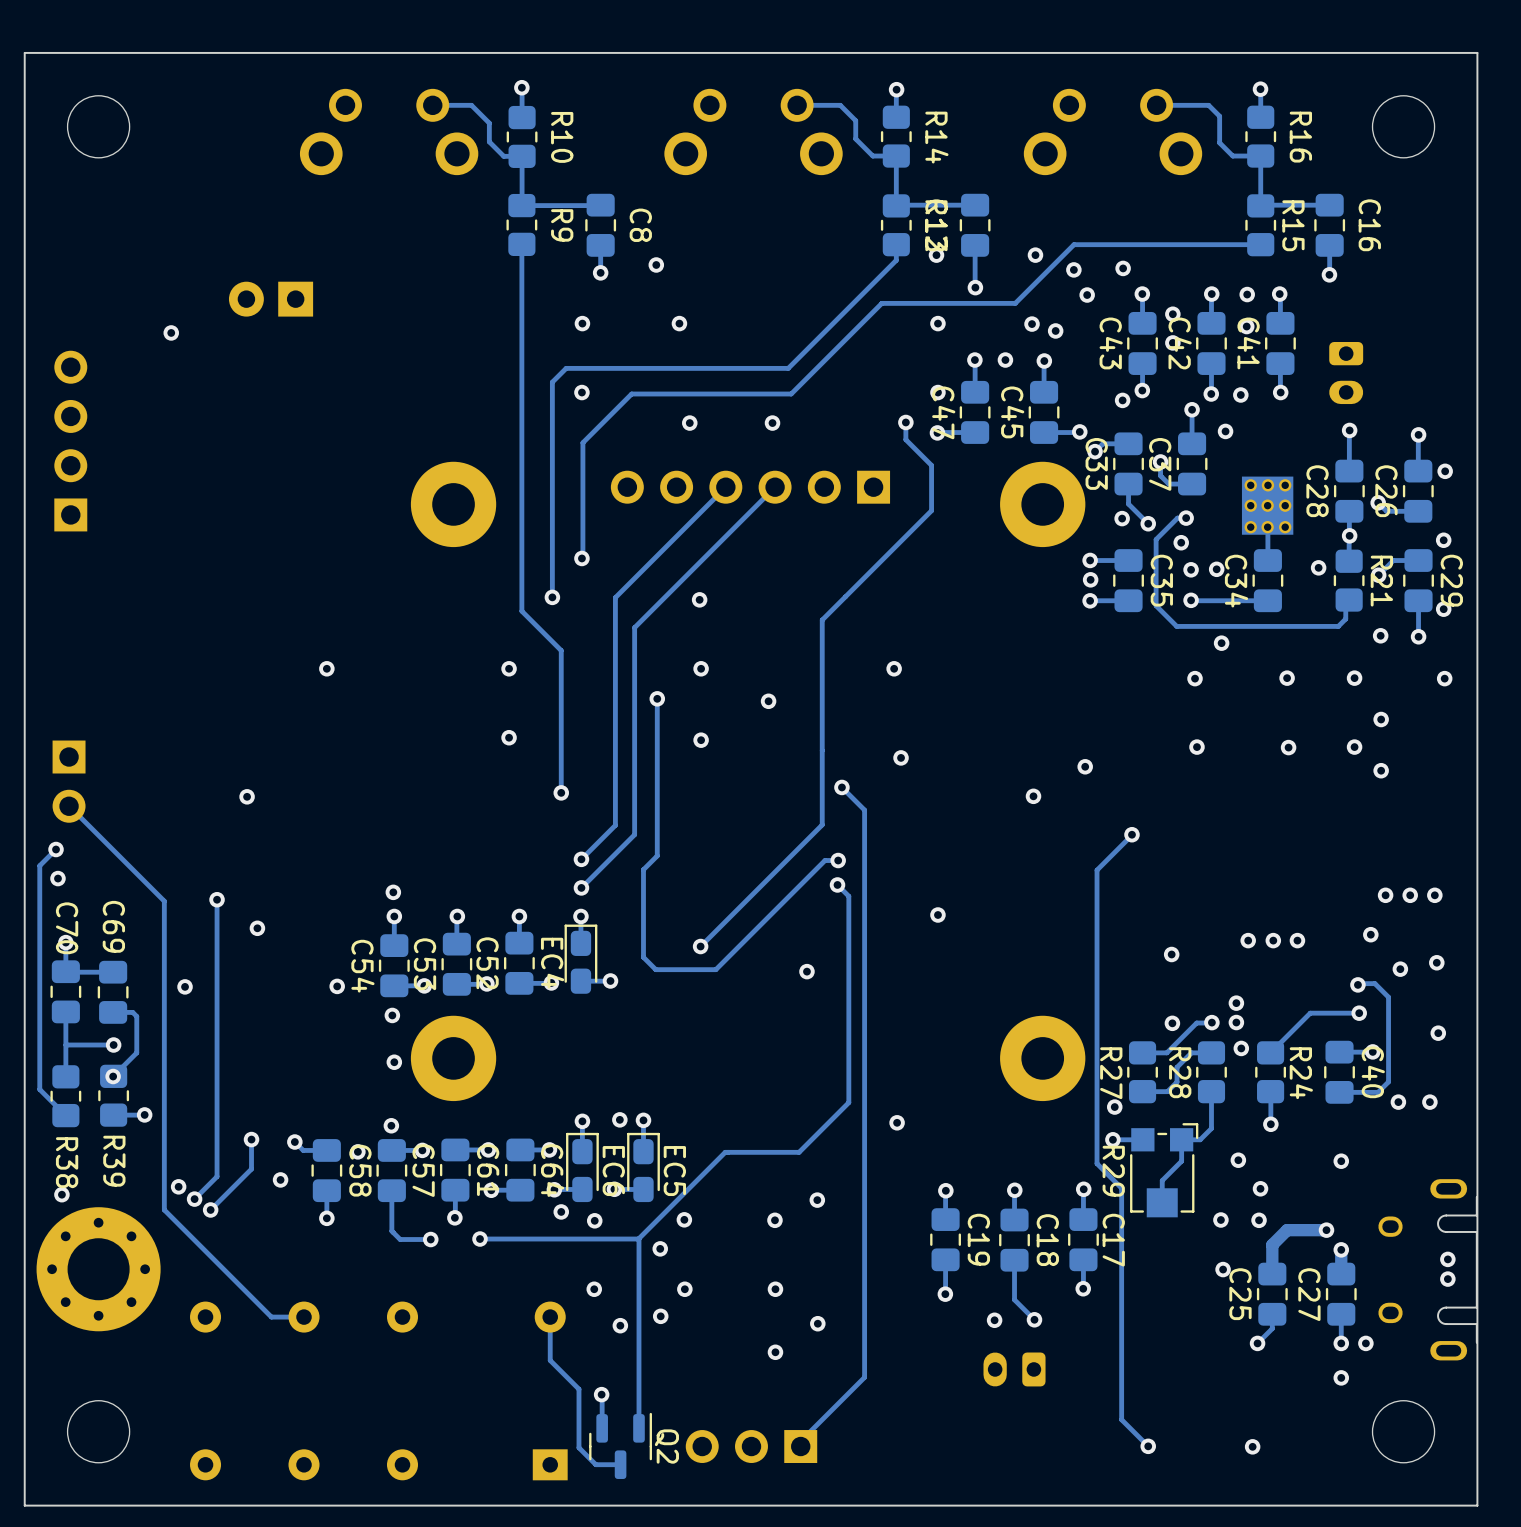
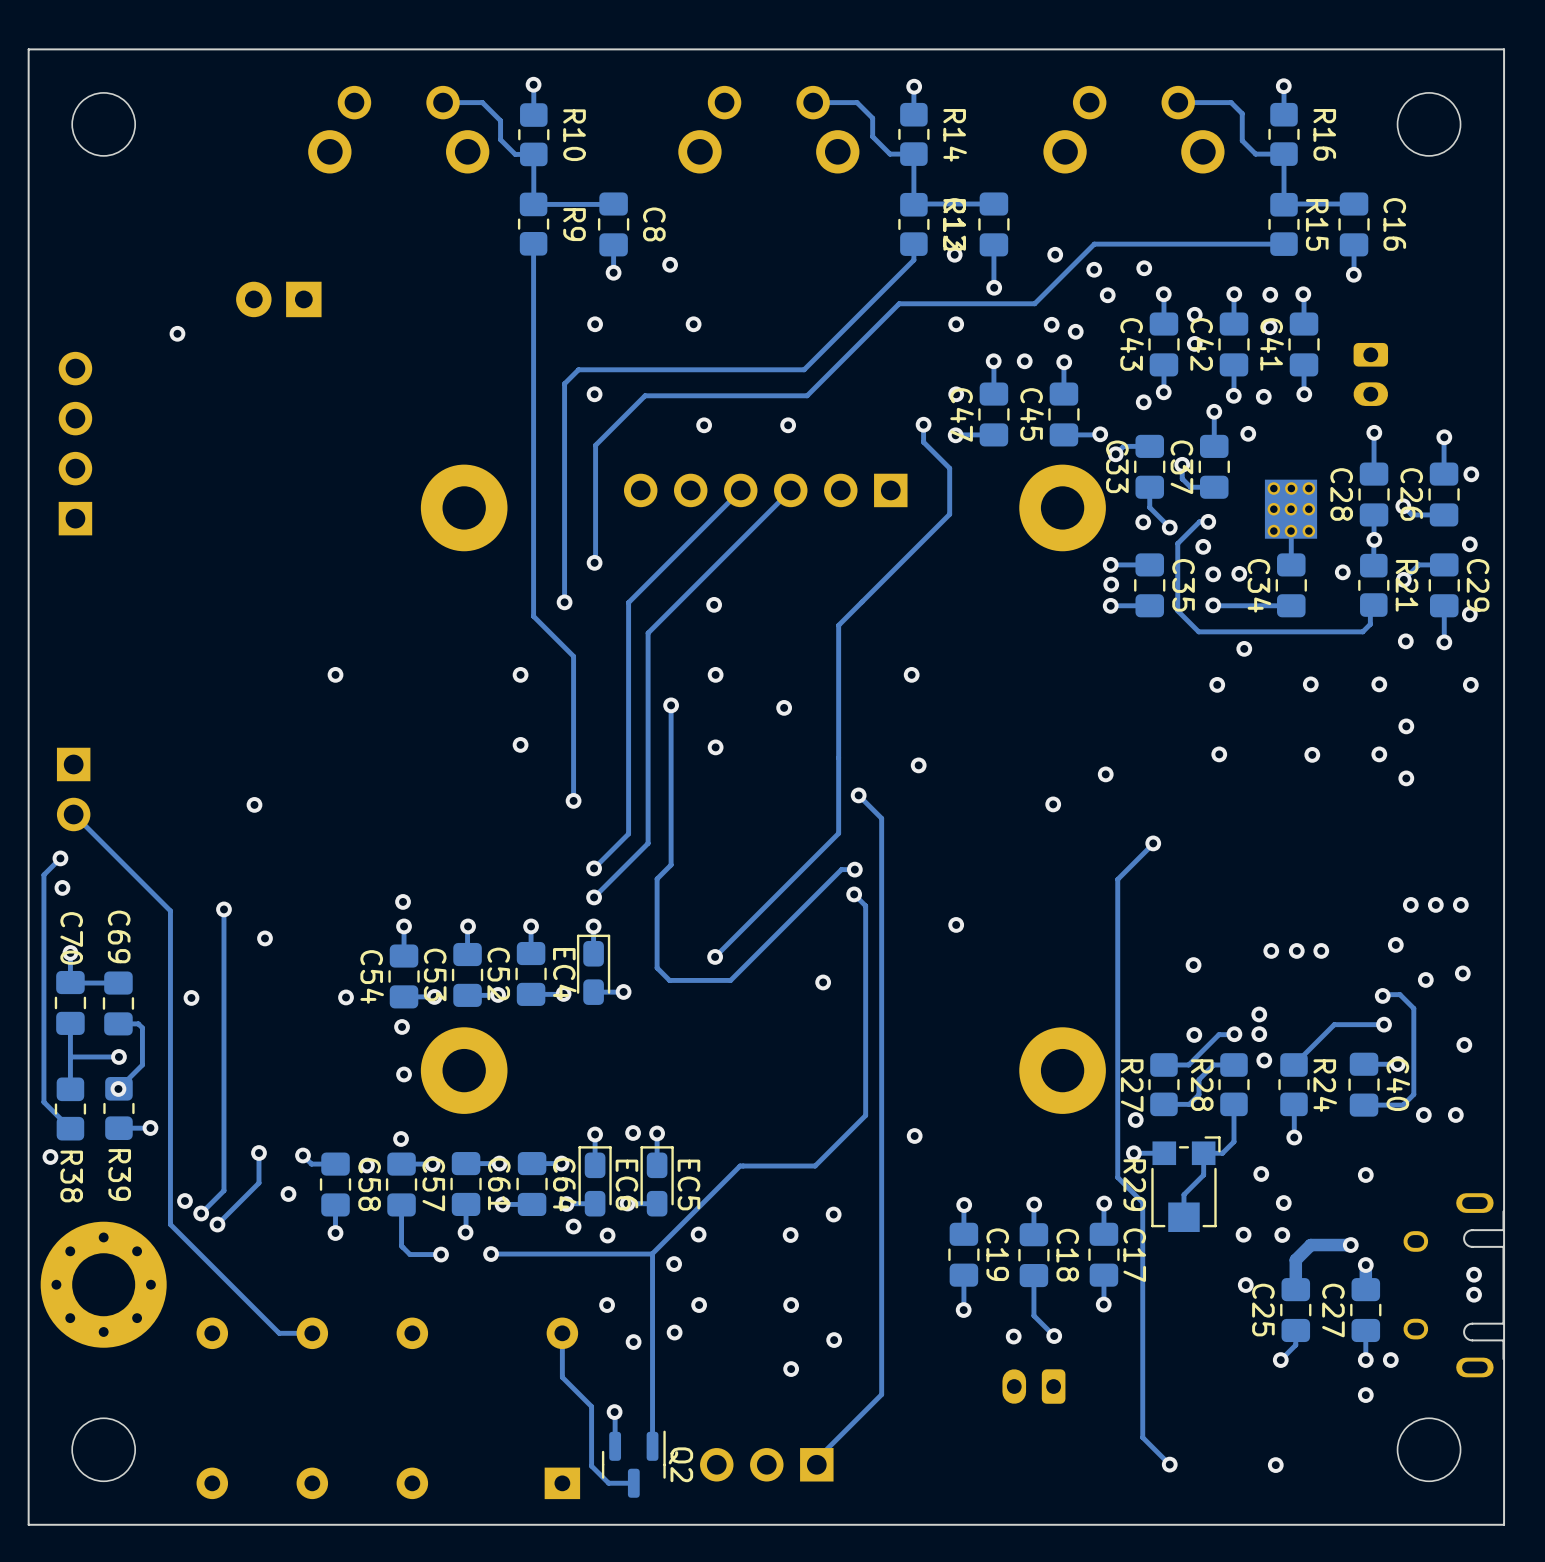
via position: (61, 1194) -> (50, 1157)

